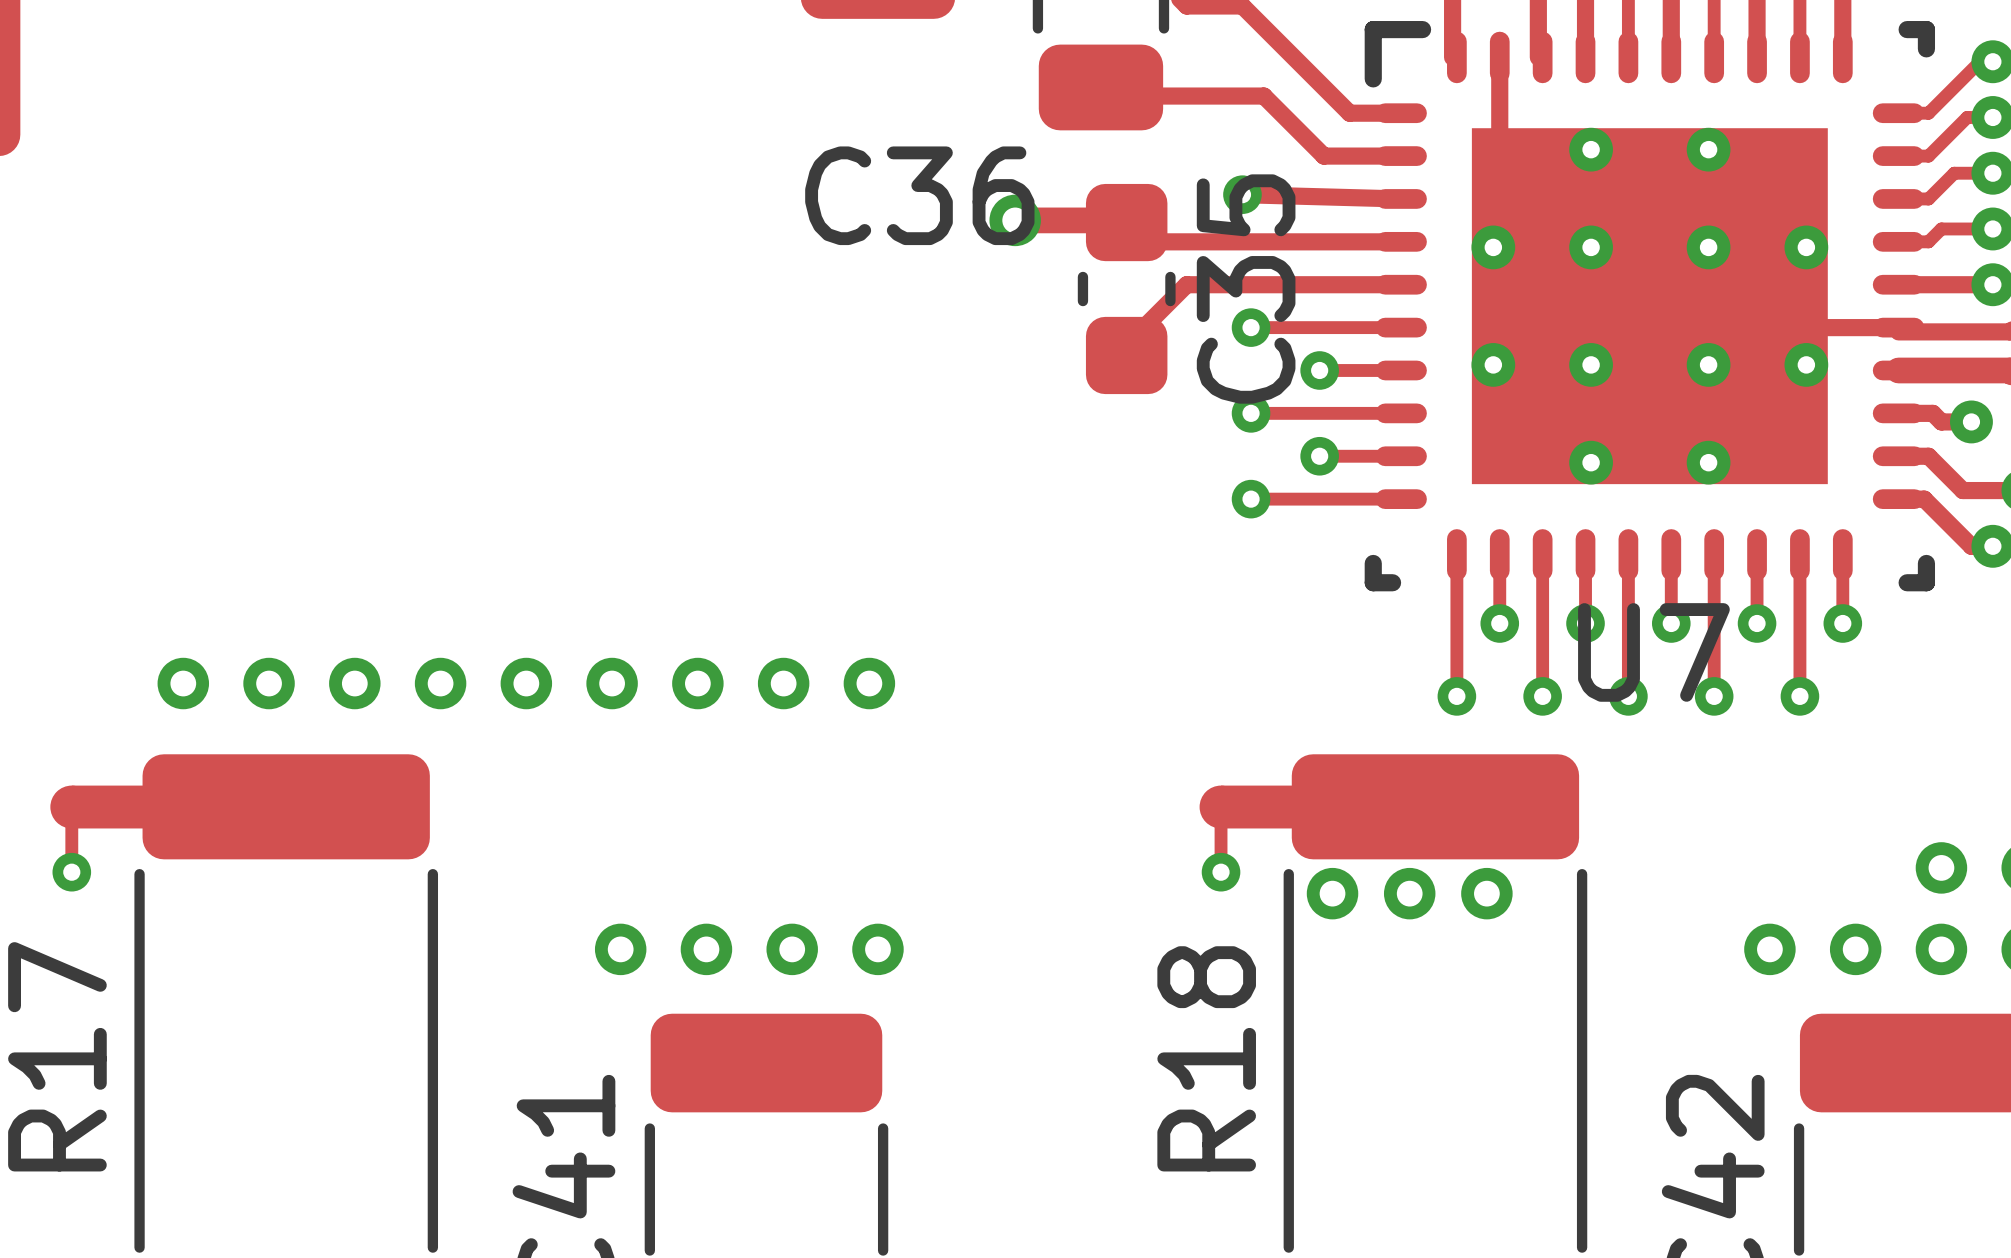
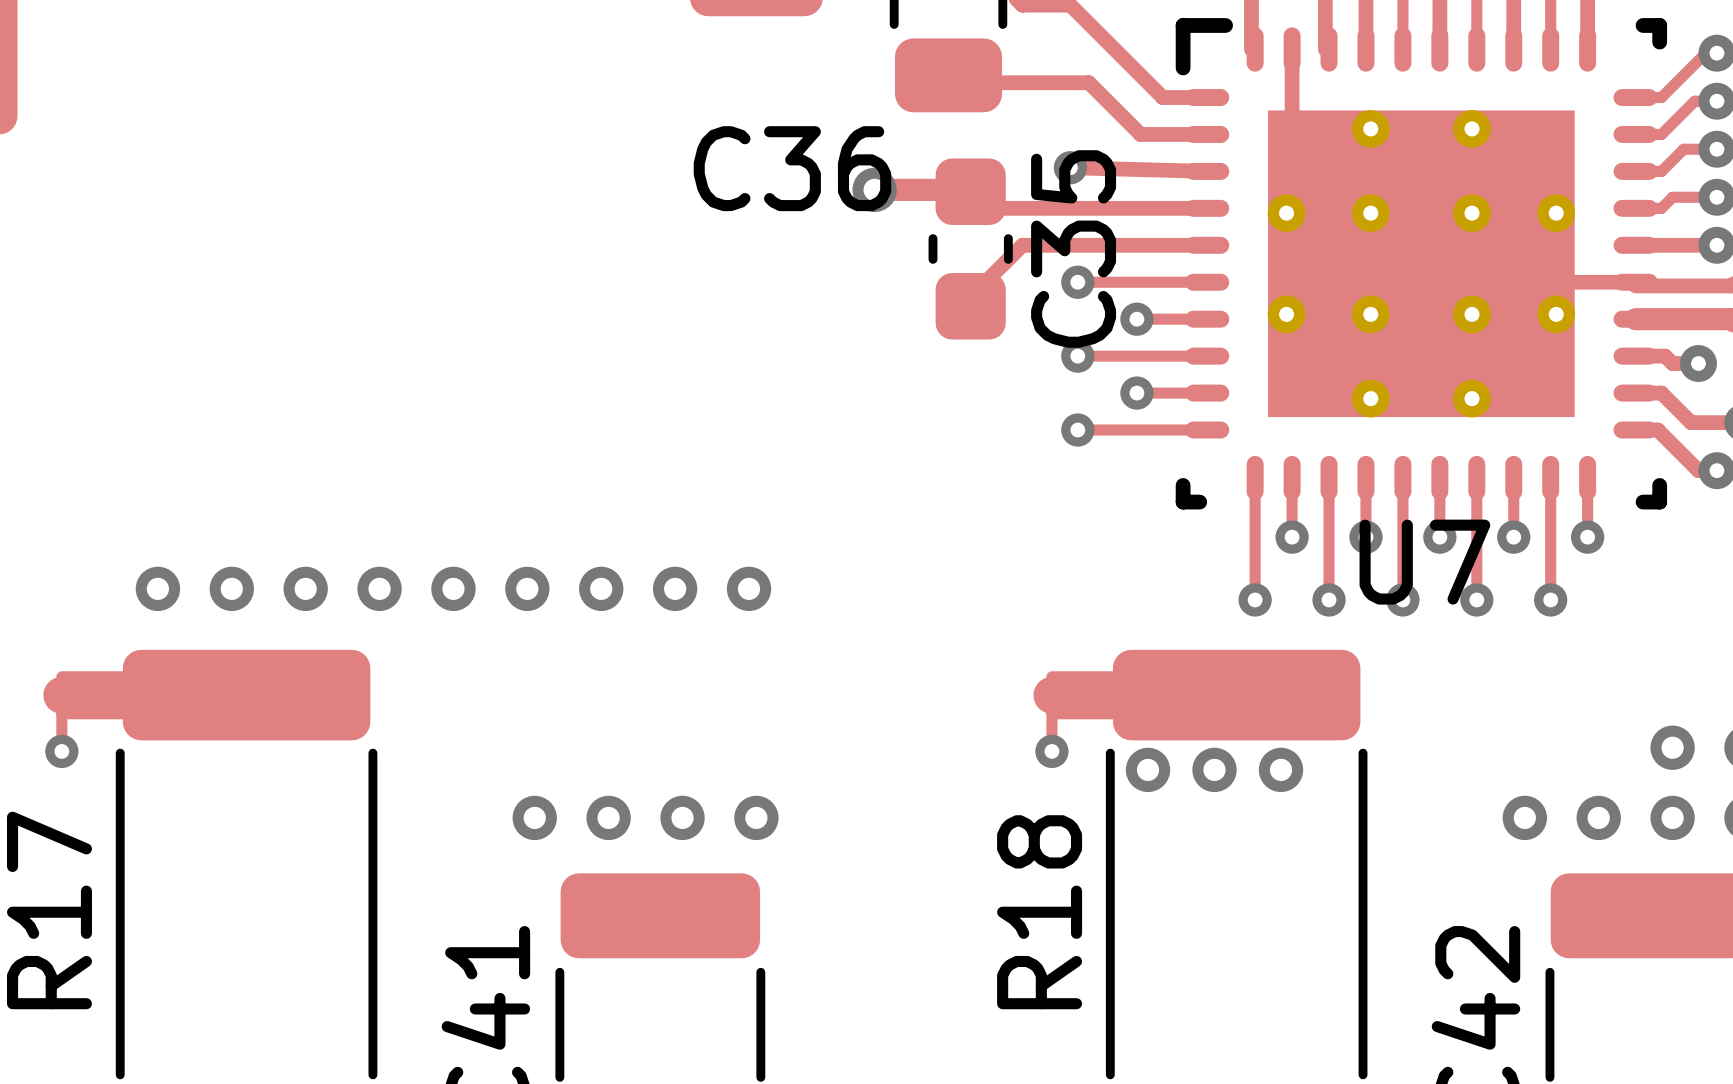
part footprint: [50, 785, 180, 829] -> [43, 671, 155, 720]
part footprint: [1199, 785, 1329, 829] -> [1033, 671, 1145, 720]

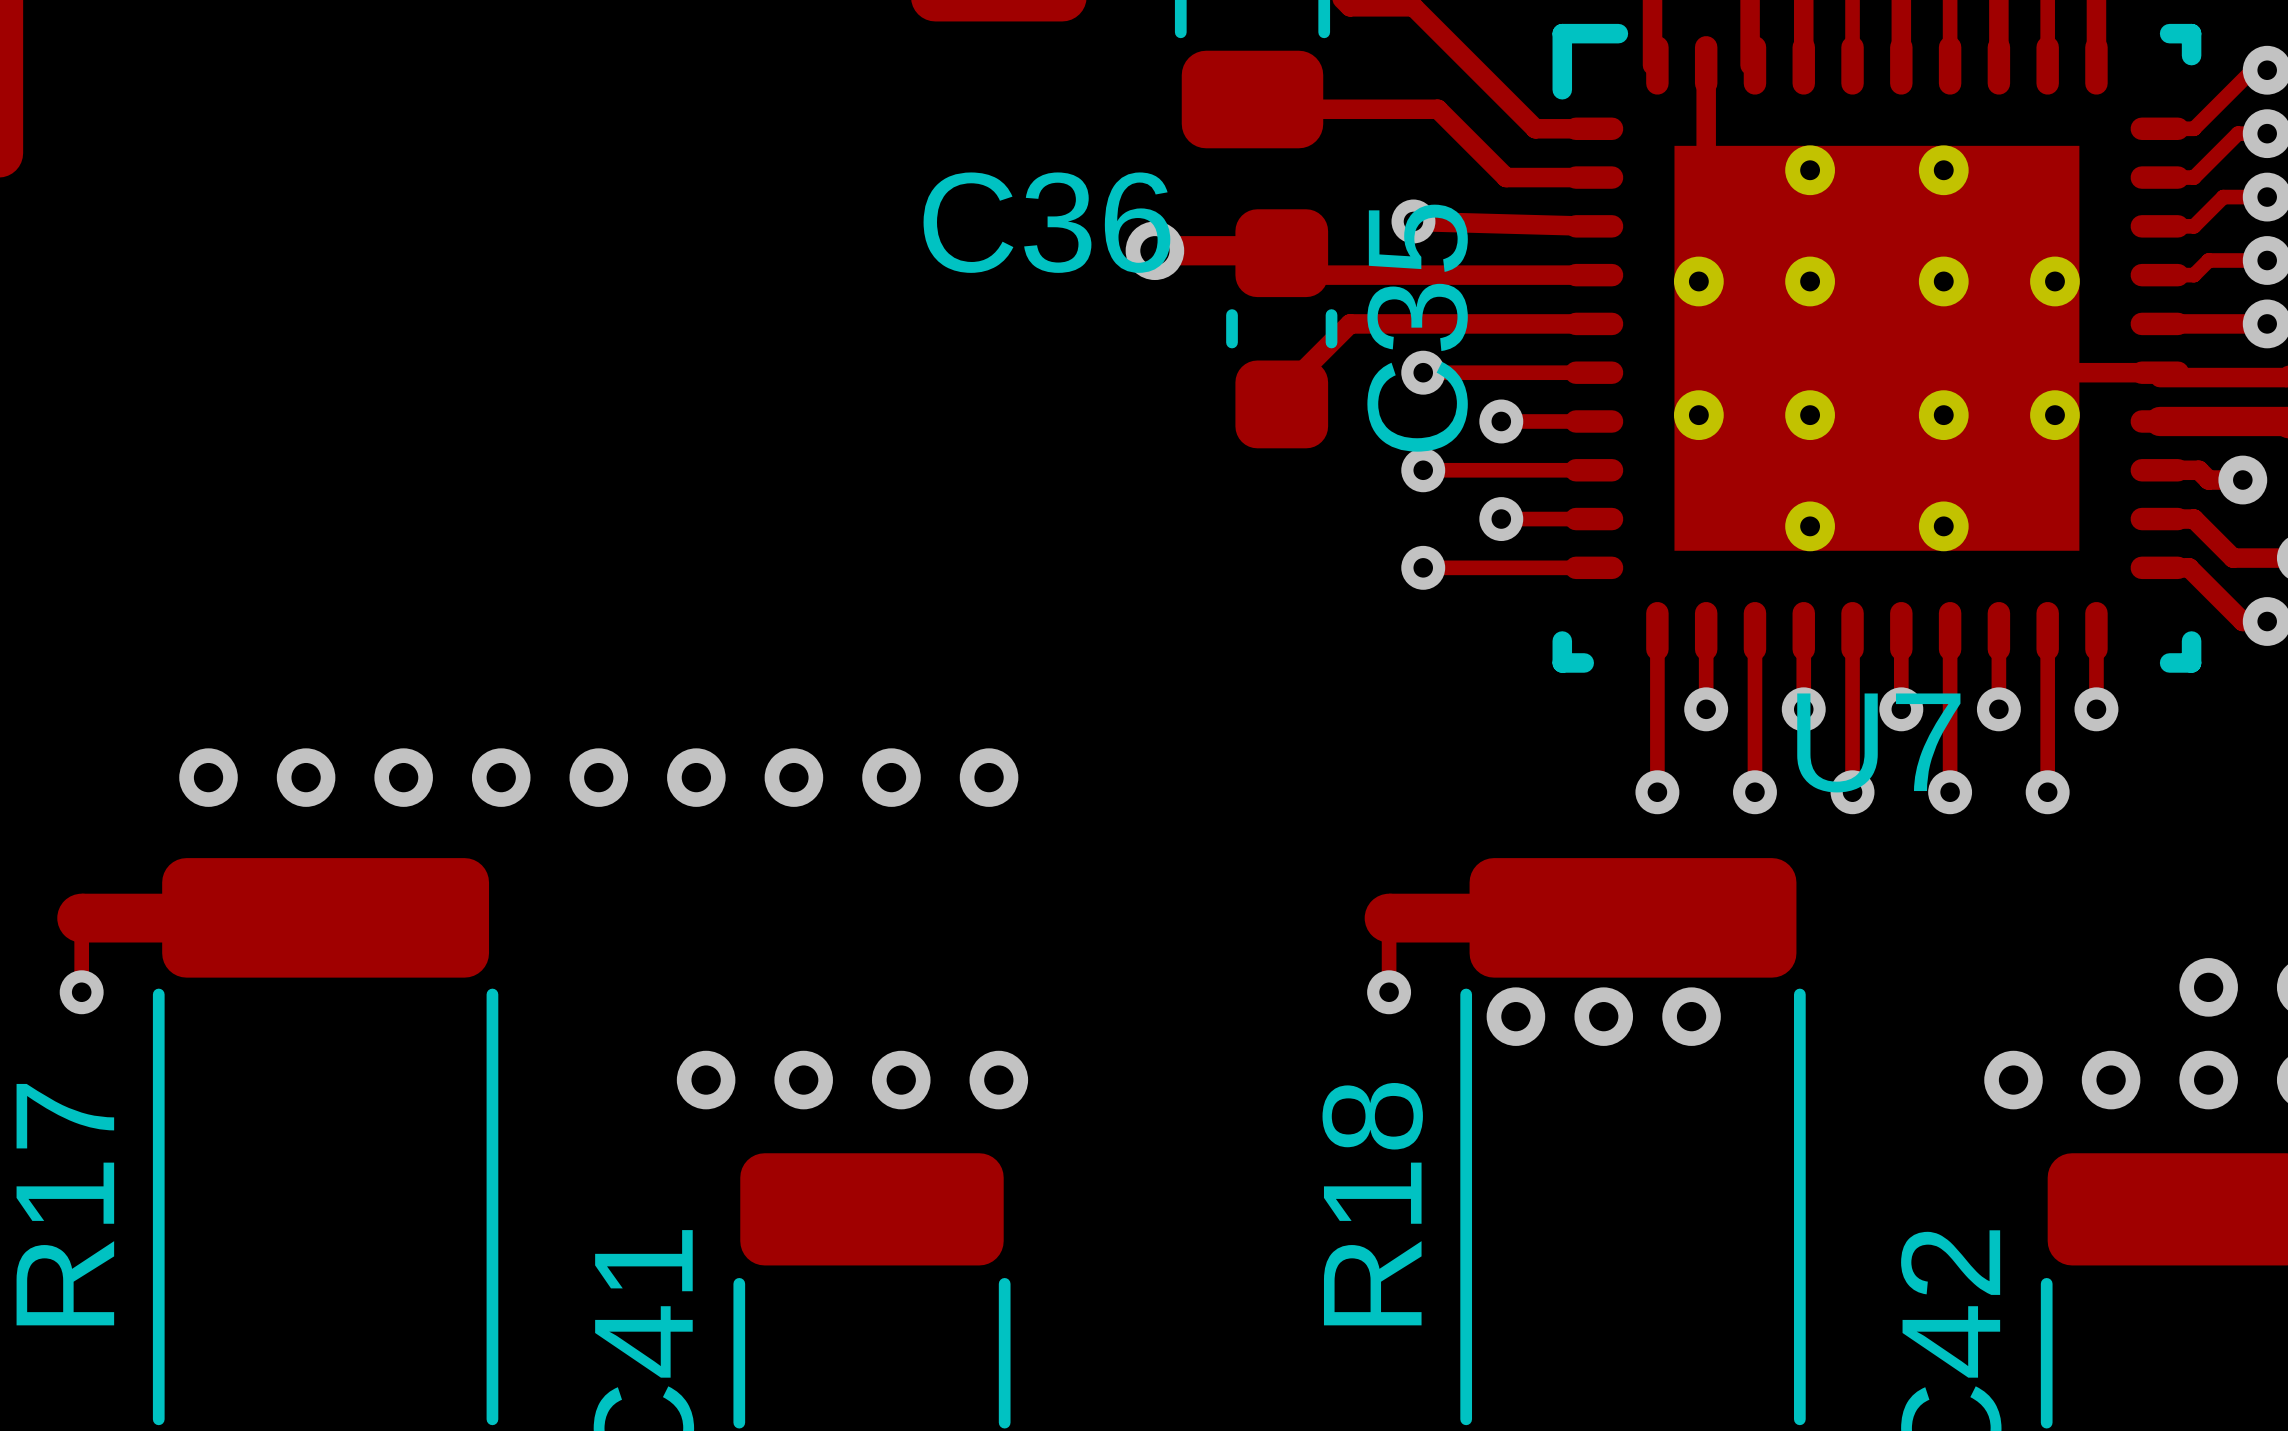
part footprint: [43, 671, 155, 720] -> [57, 893, 204, 943]
part footprint: [1033, 671, 1145, 720] -> [1364, 893, 1512, 943]

